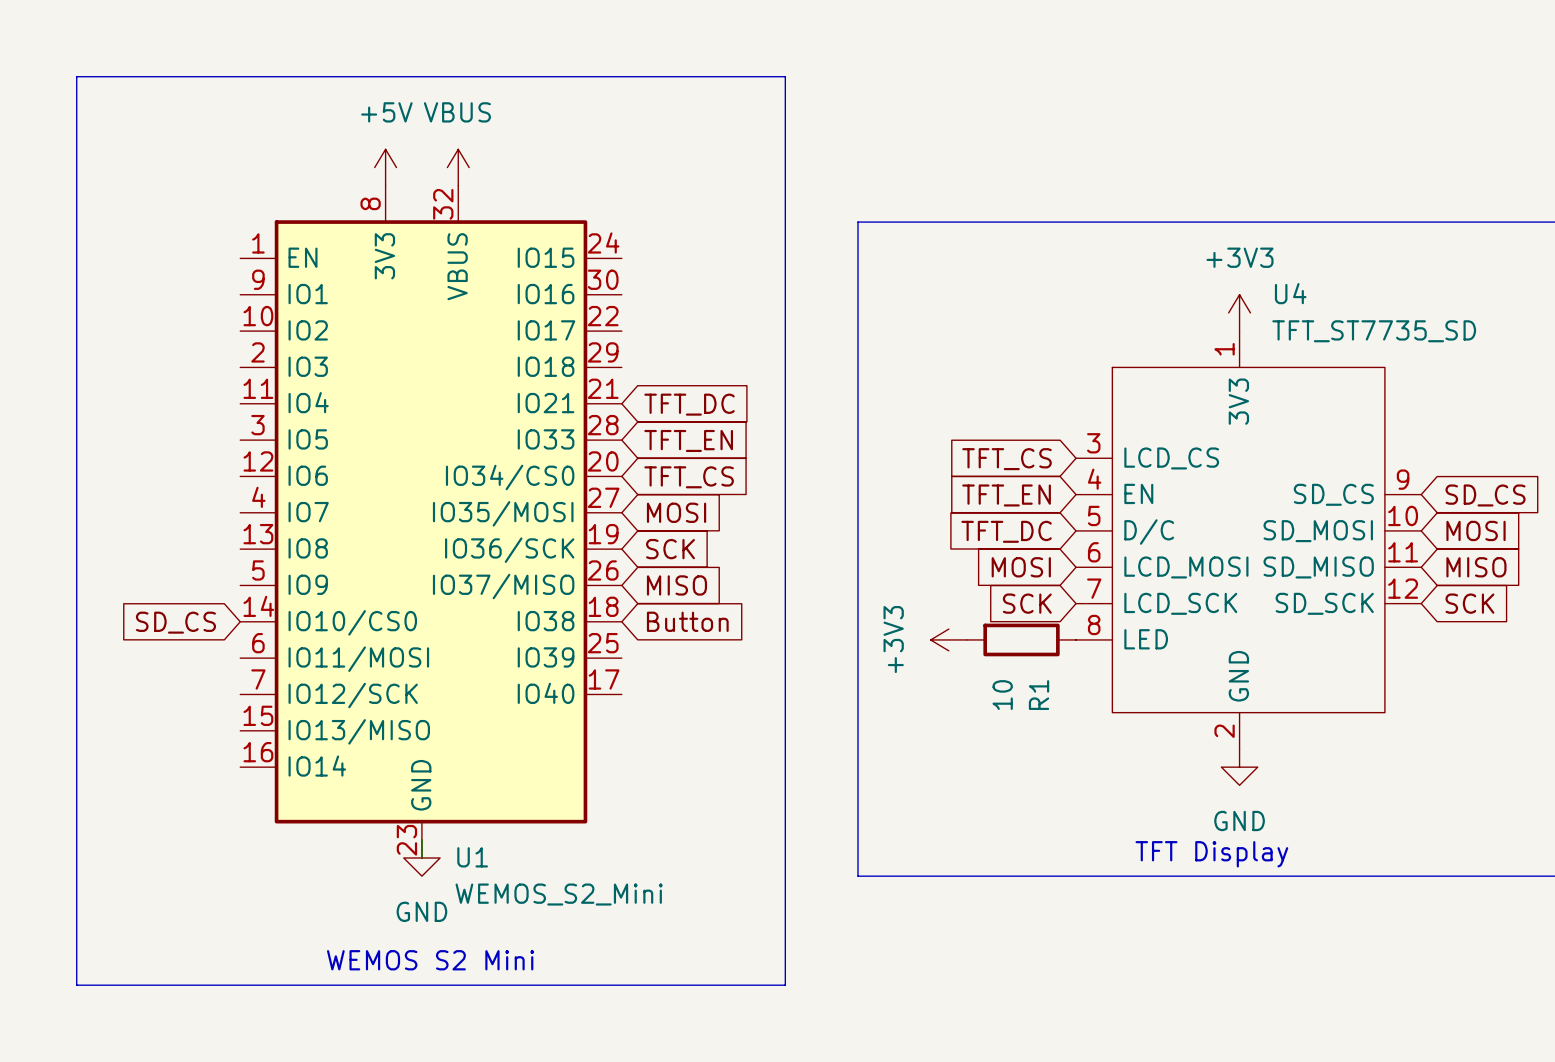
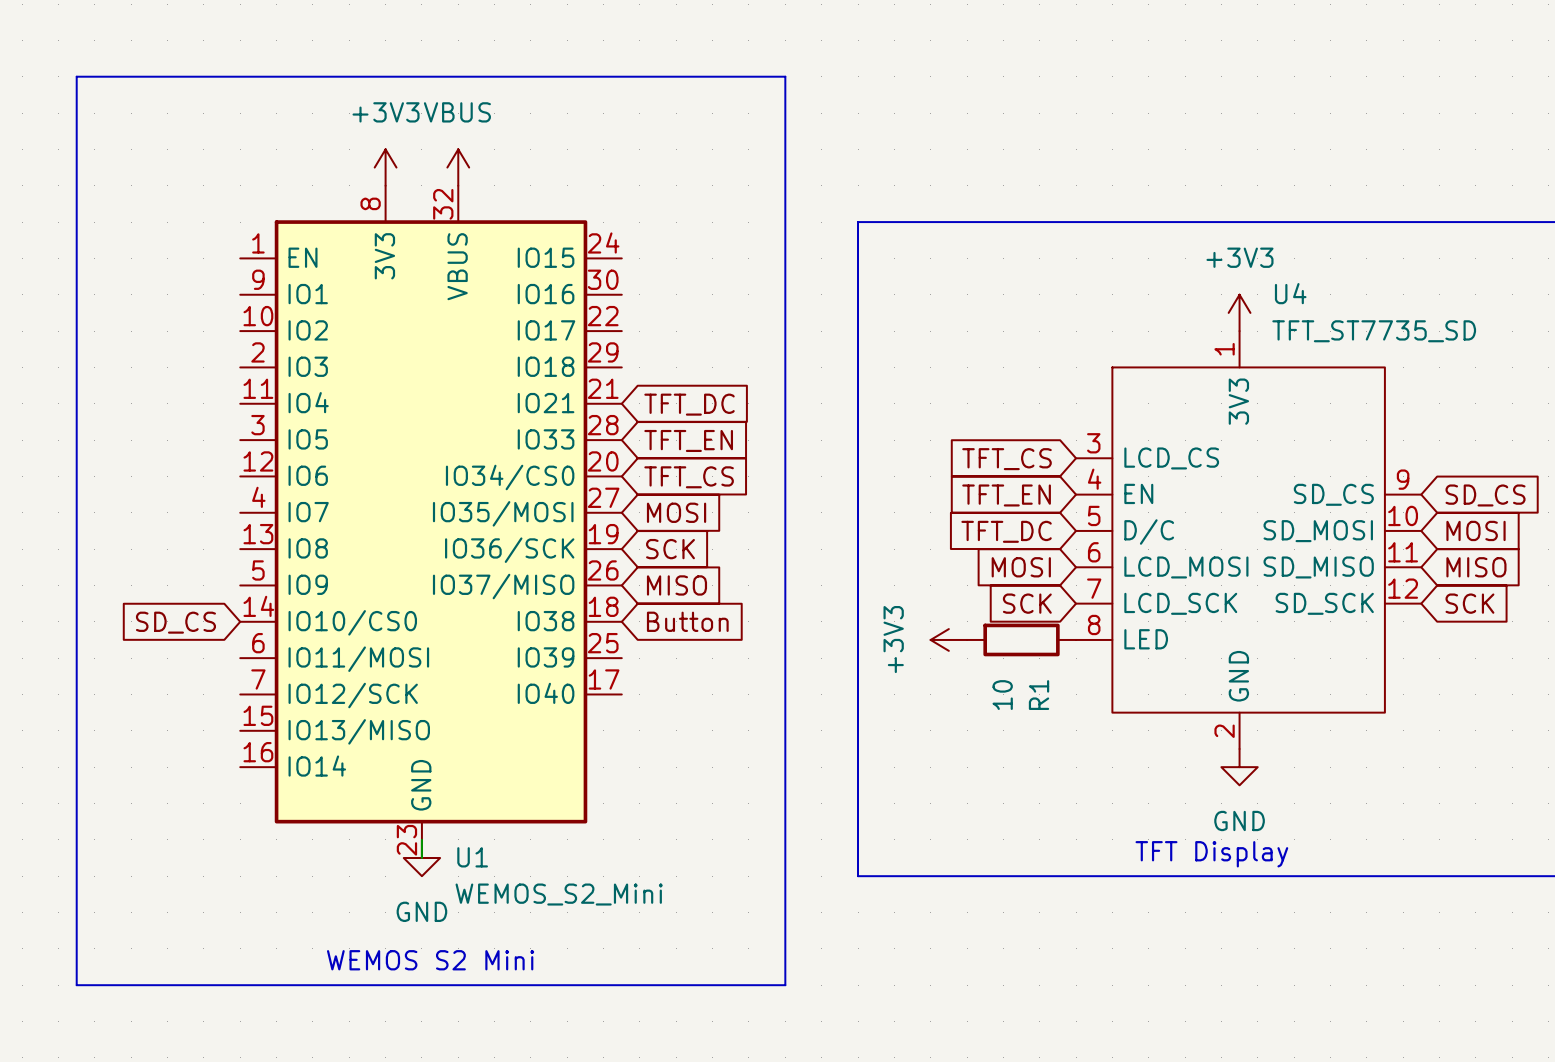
power symbol: +5V (385, 167) -> +3V3 (385, 167)

